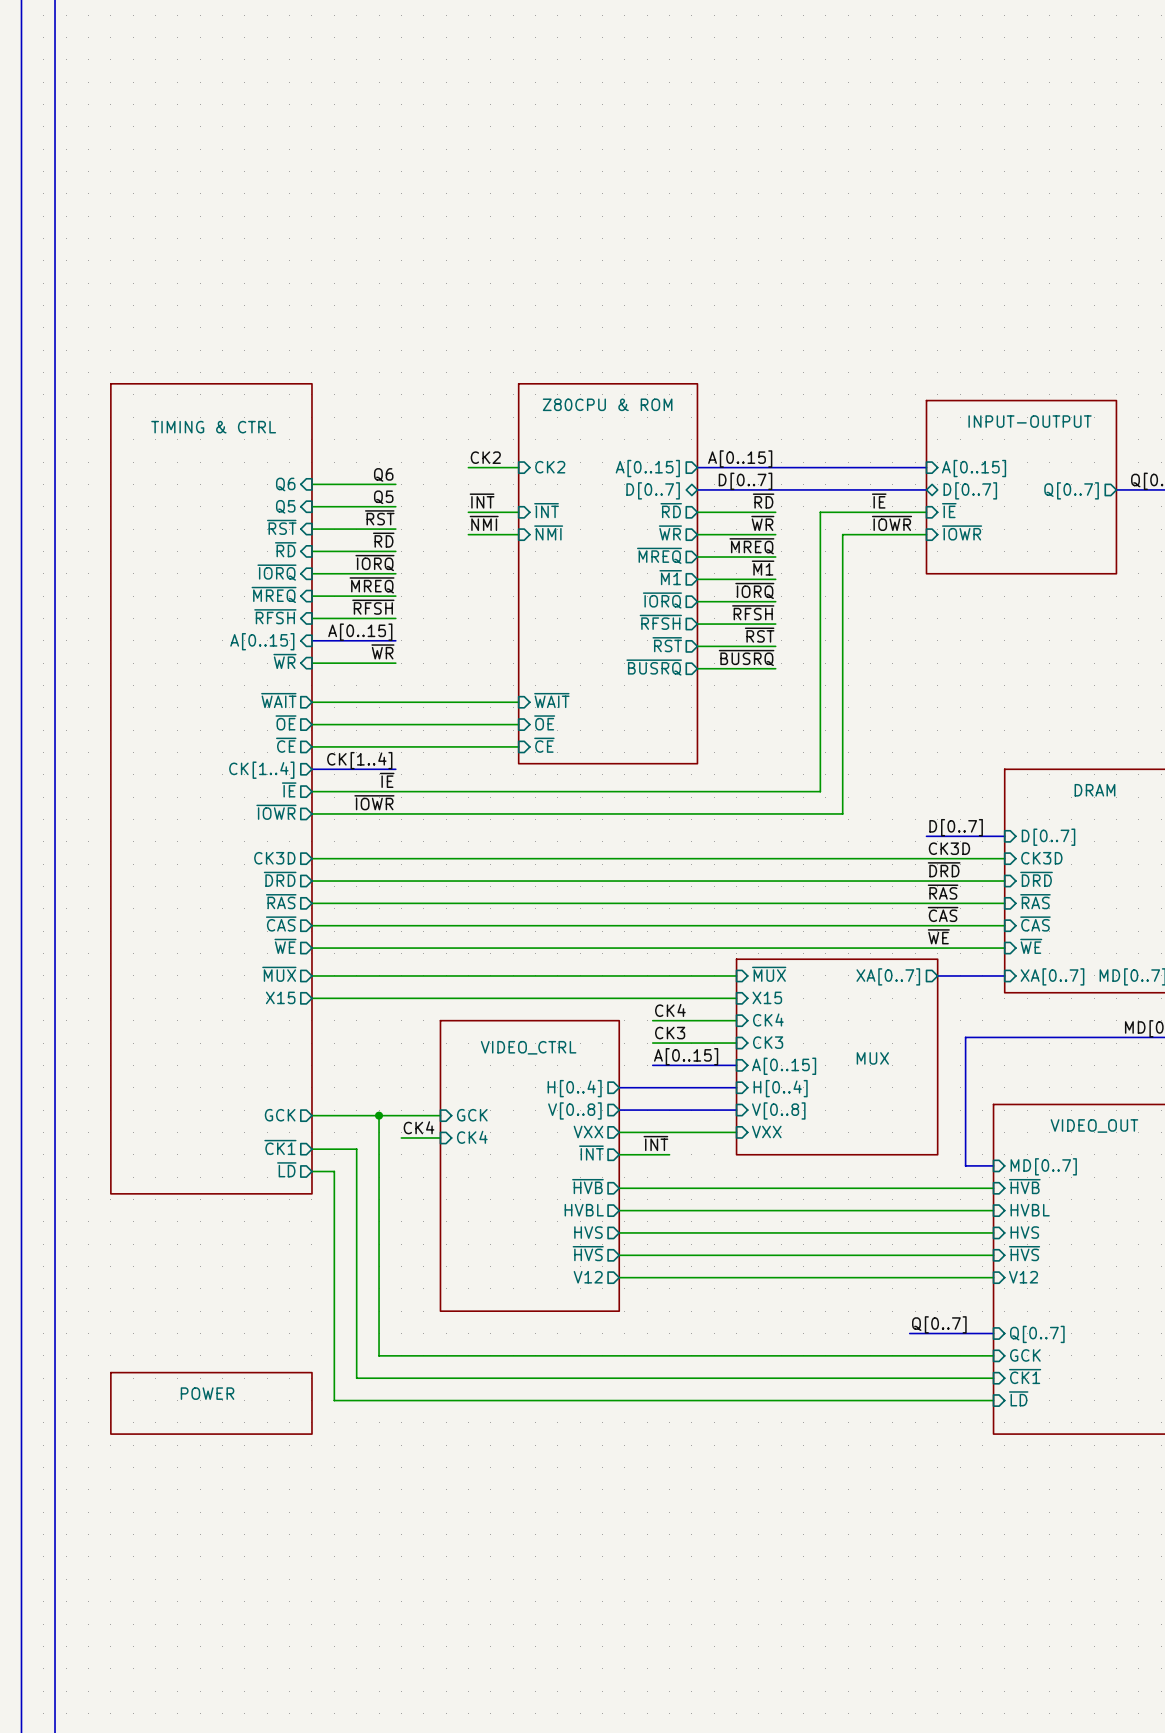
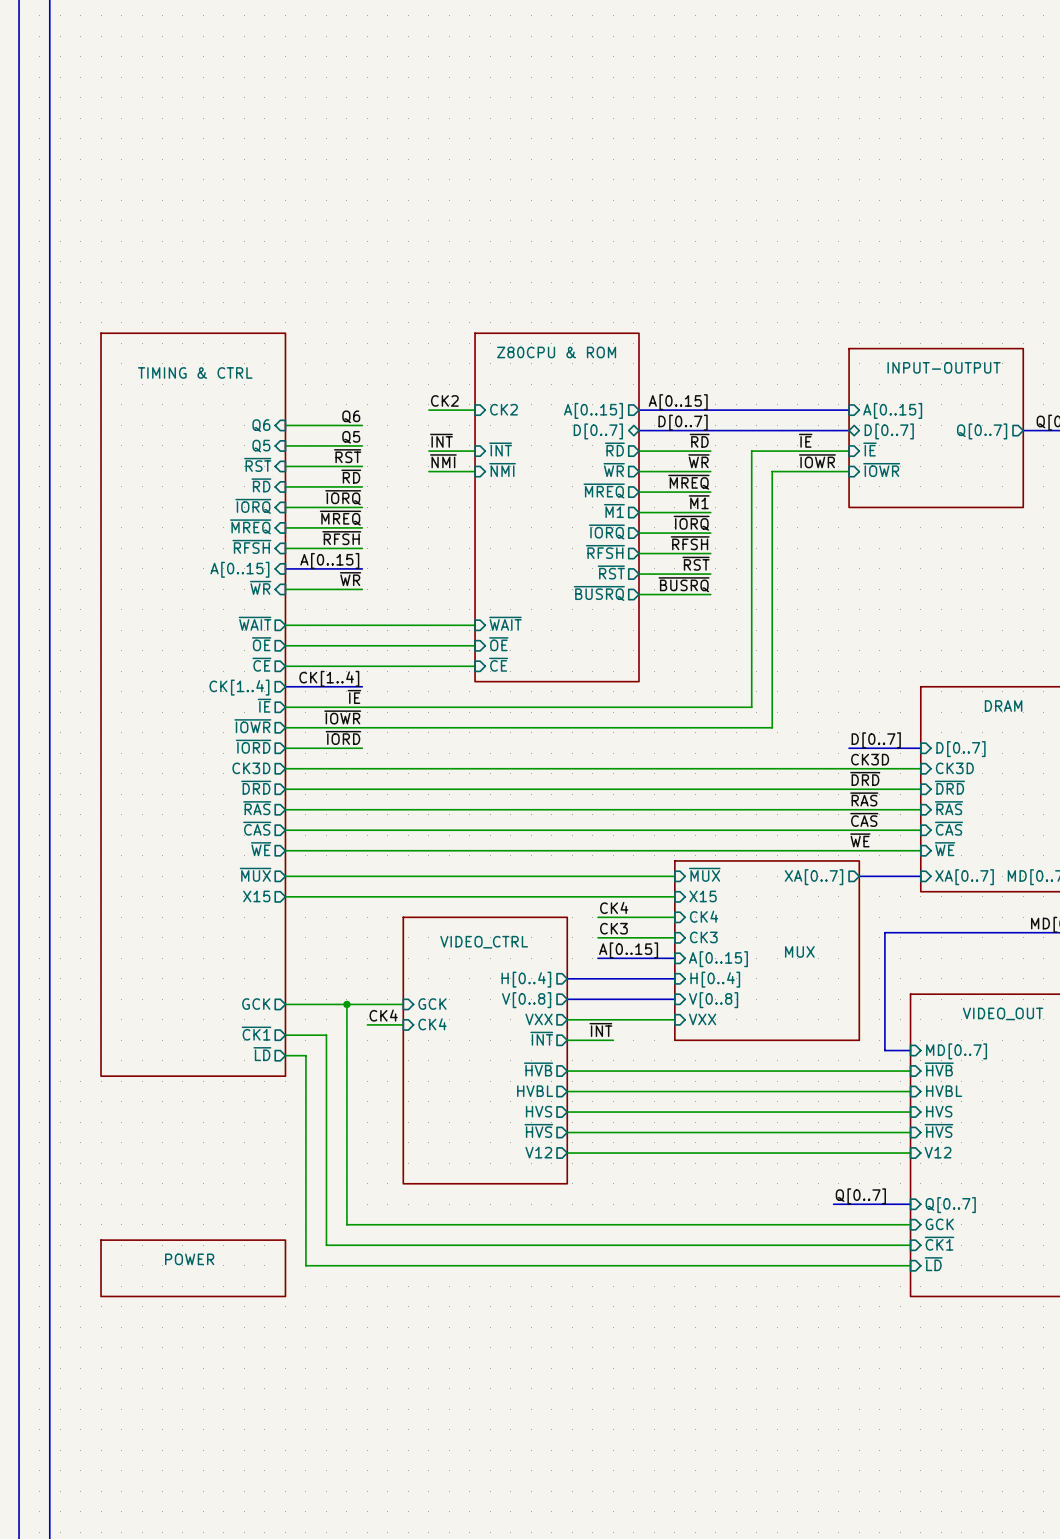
label: none -> ~{IORD} (343, 737)
sheet pin: none -> ~{IORD} (253, 746)
wire: none -> (285, 748) (362, 748)

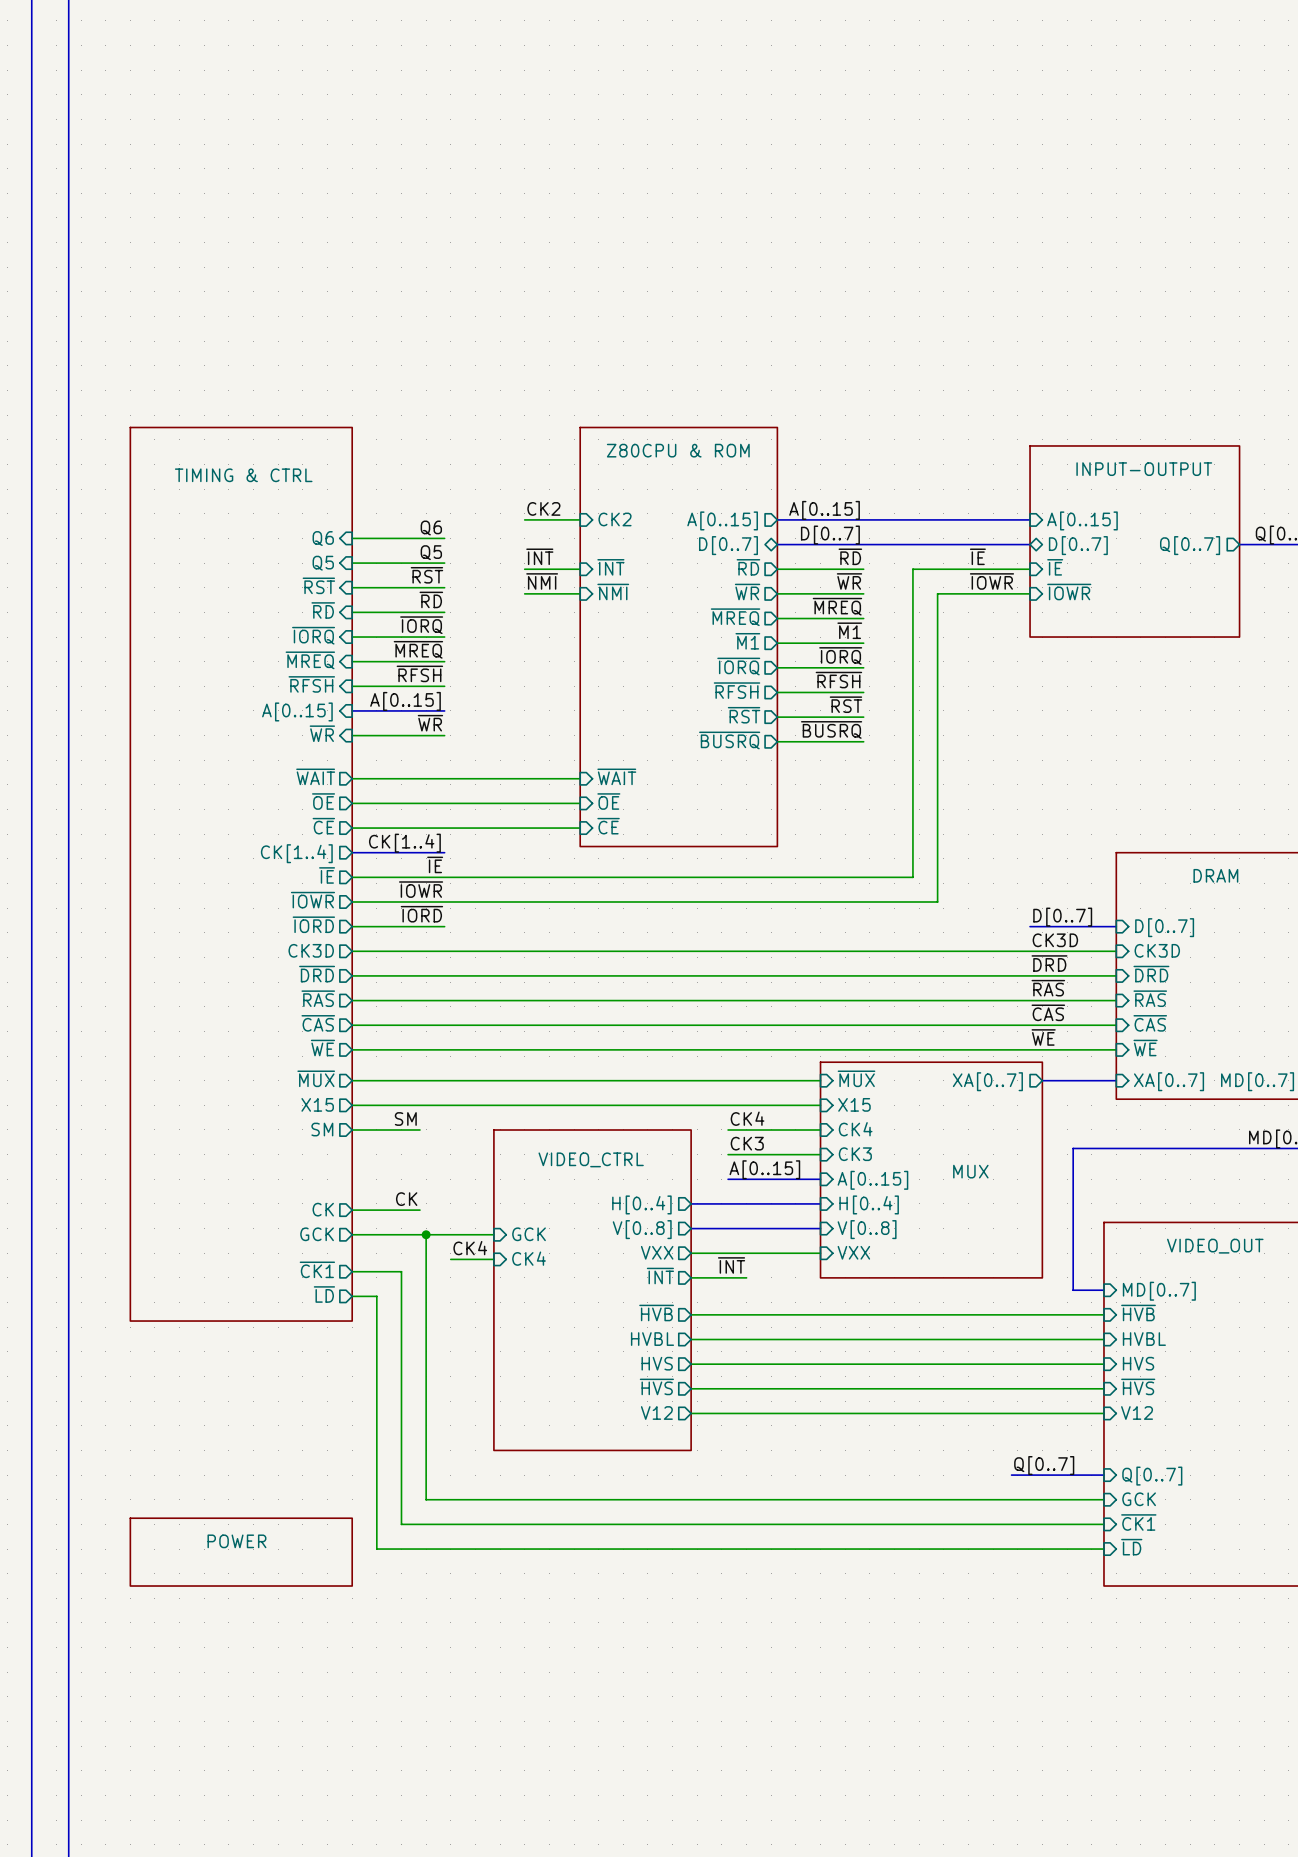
label: none -> SM (405, 1119)
sheet pin: none -> SM (322, 1129)
wire: none -> (352, 1129) (419, 1129)
label: none -> CK (406, 1199)
sheet pin: none -> CK (323, 1209)
wire: none -> (352, 1210) (419, 1210)

